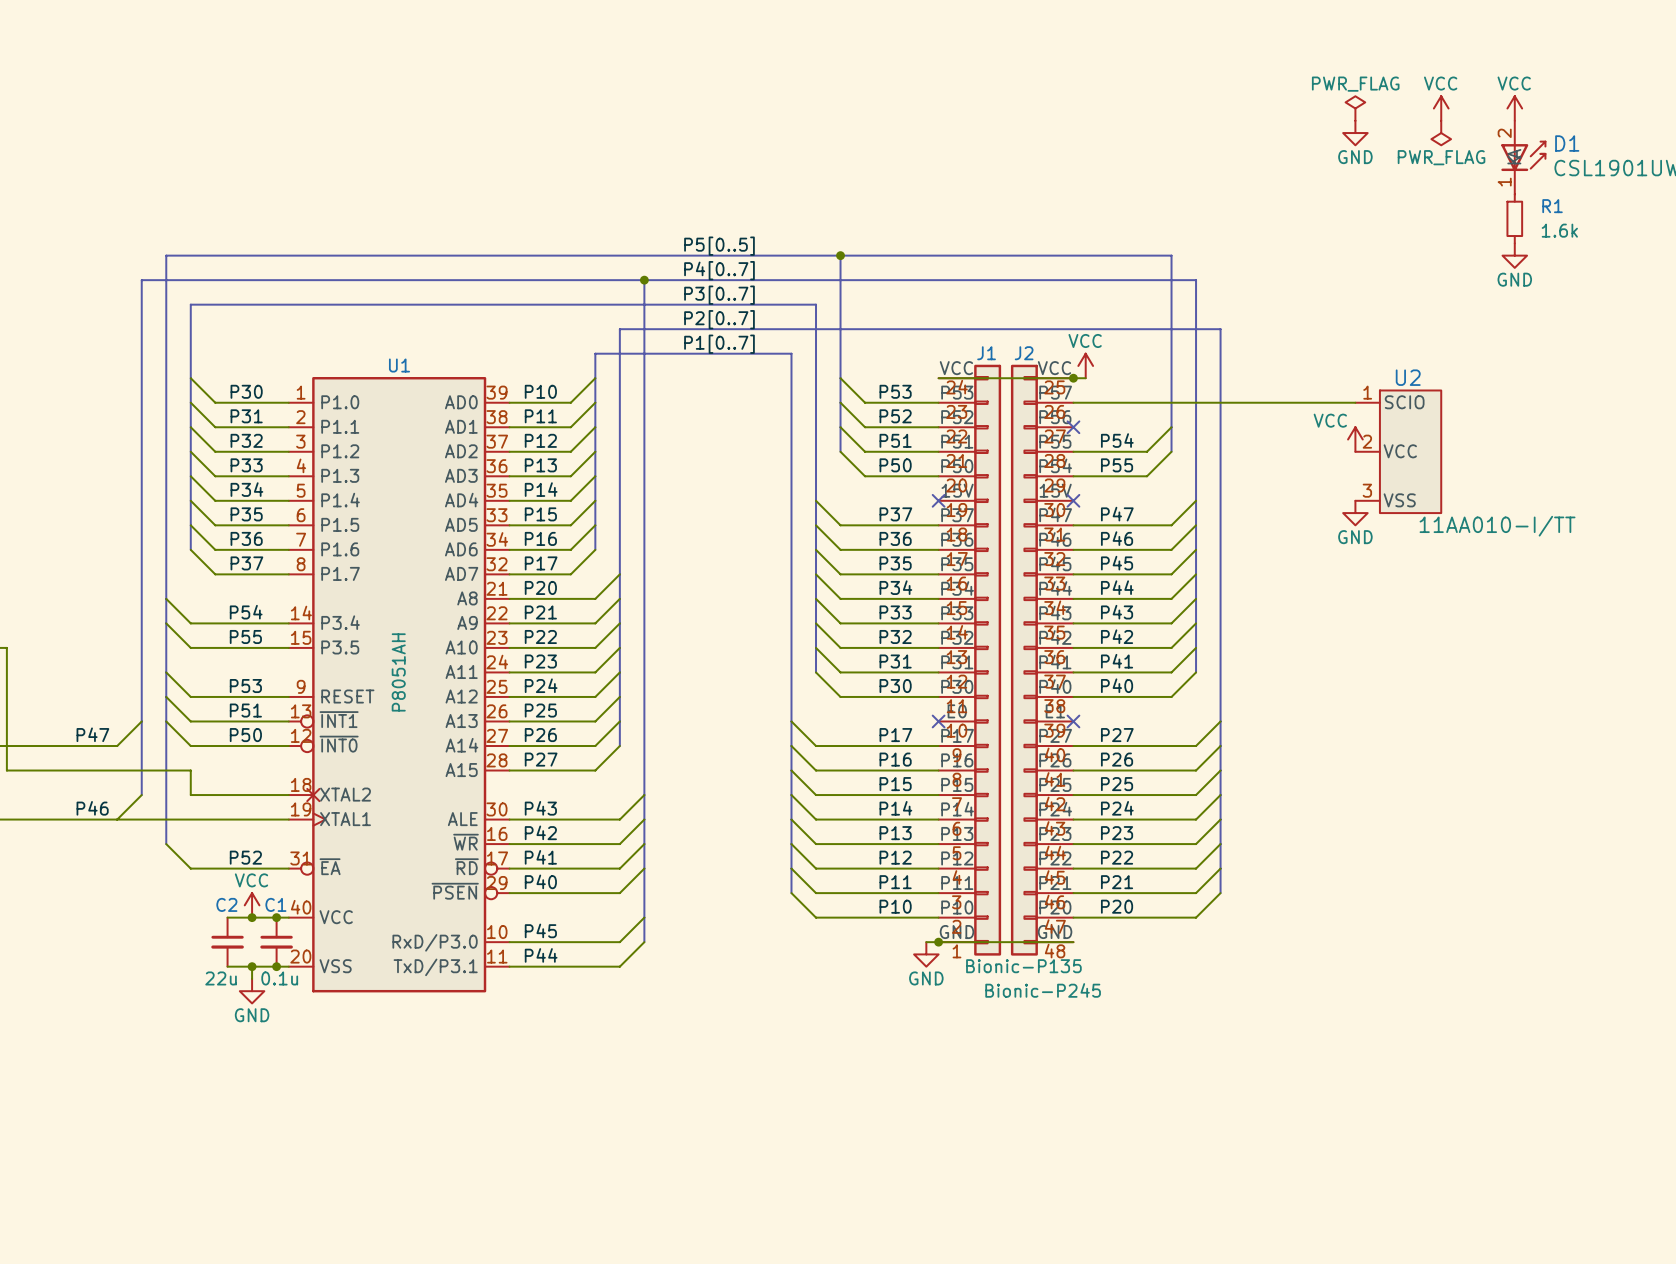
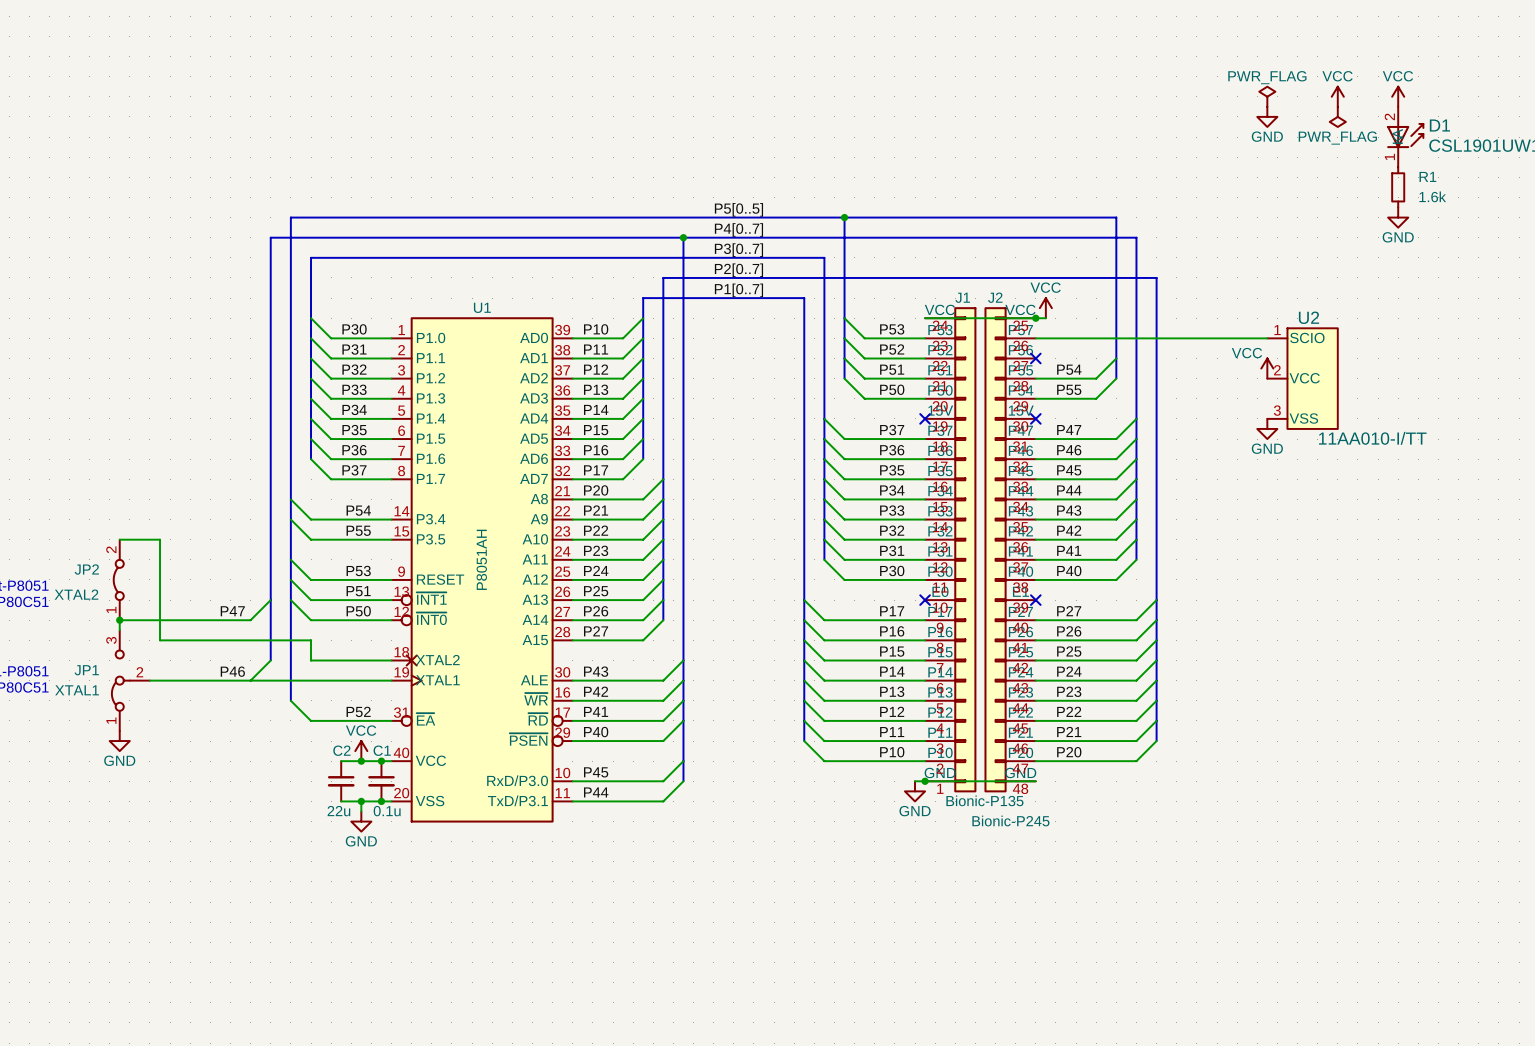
U1 pin number: 33 (496, 515) -> 34 (562, 430)
U1 pin number: 34 (497, 539) -> 33 (562, 450)

